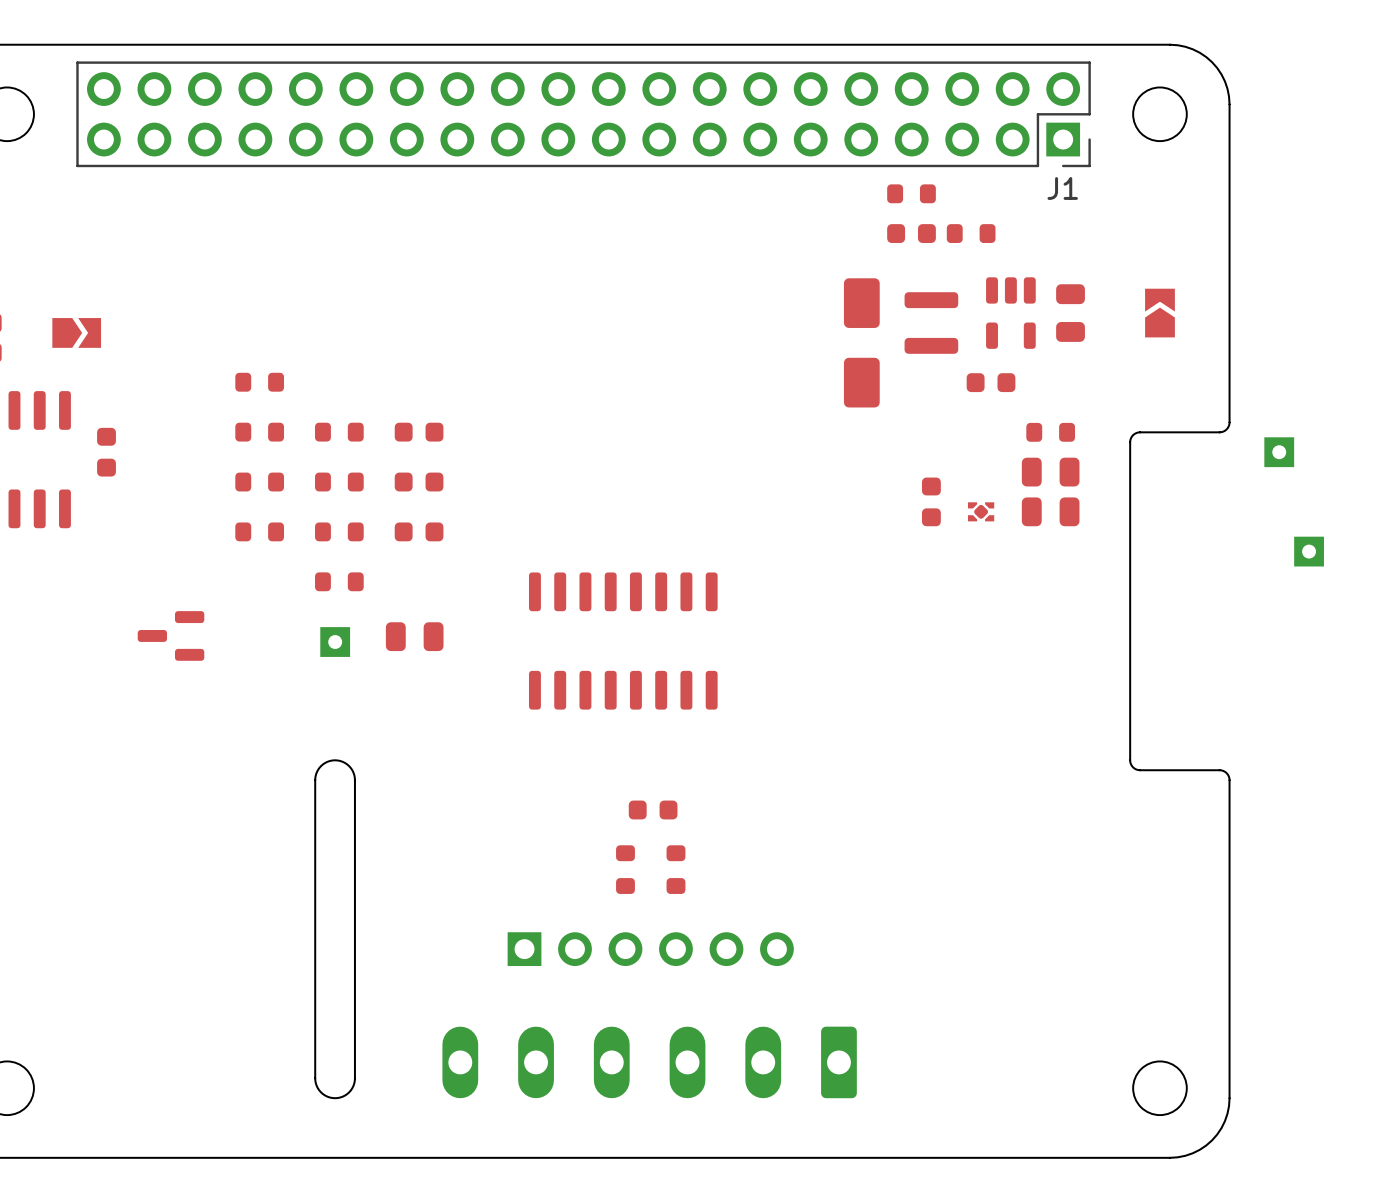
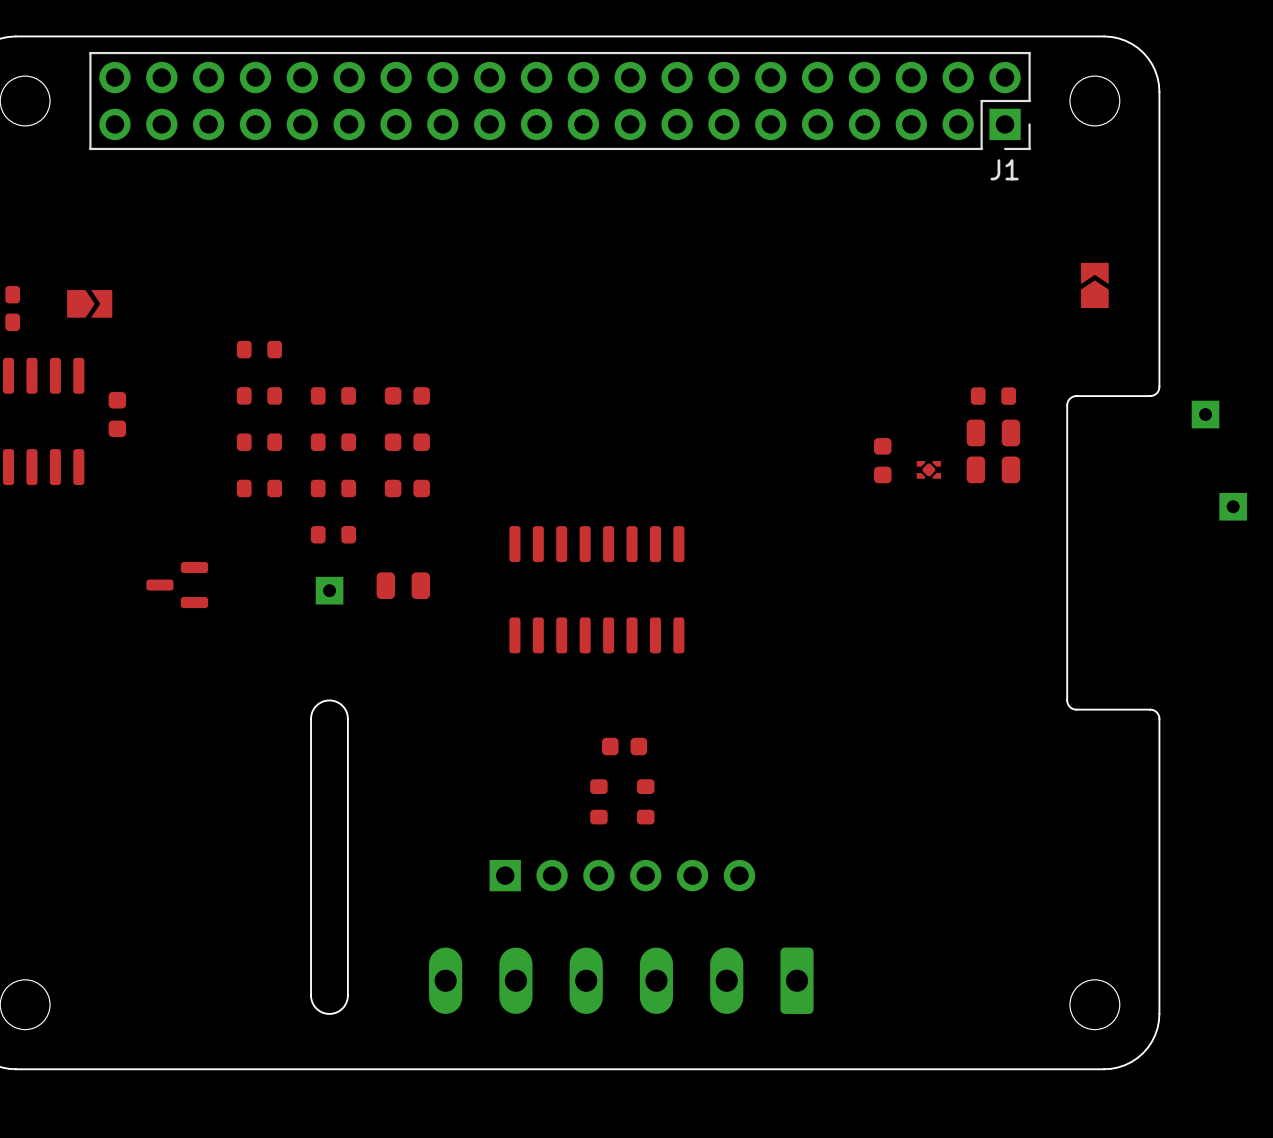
part: (911, 193) -> none
part: (911, 233) -> none
part: (971, 233) -> none
part: (1010, 313) -> none
part: (1070, 313) -> none
part: (931, 323) -> none
part: (861, 342) -> none
part: (991, 382) -> none

